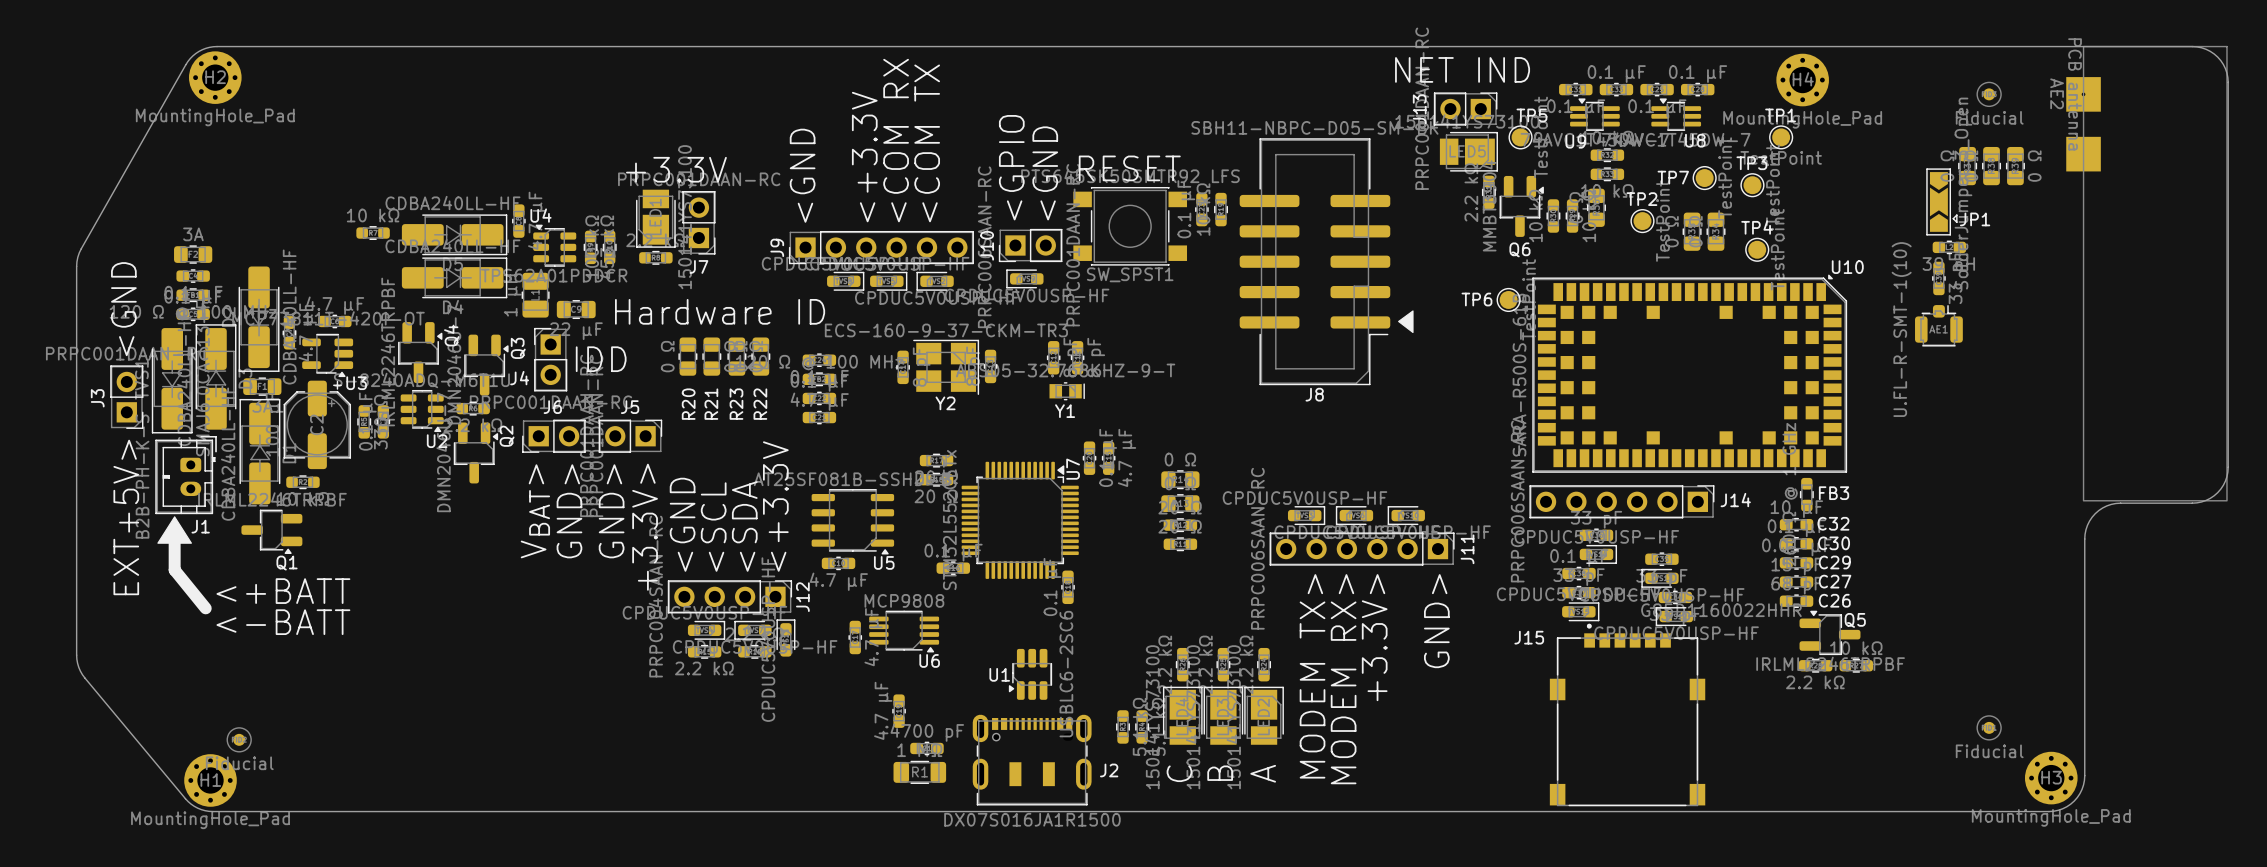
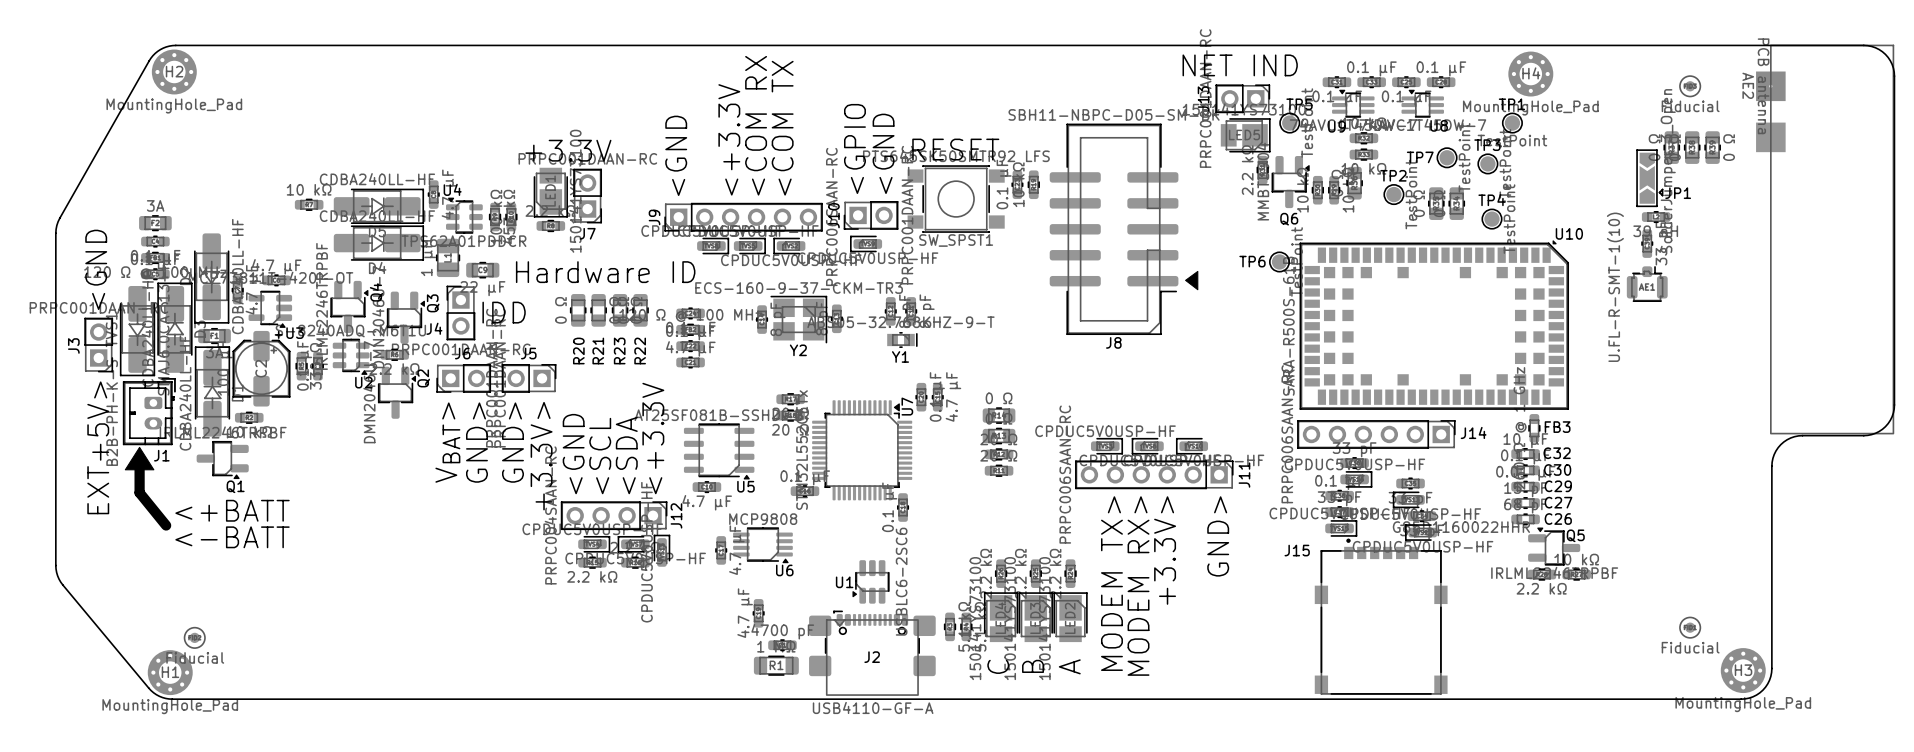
J2 footprint: [972, 714, 1092, 806] -> [809, 610, 936, 696]
J2 name position: J2 (1109, 770) -> J2 (872, 657)
J2 value: DX07S016JA1R1500 (1032, 819) -> USB4110-GF-A (873, 707)

